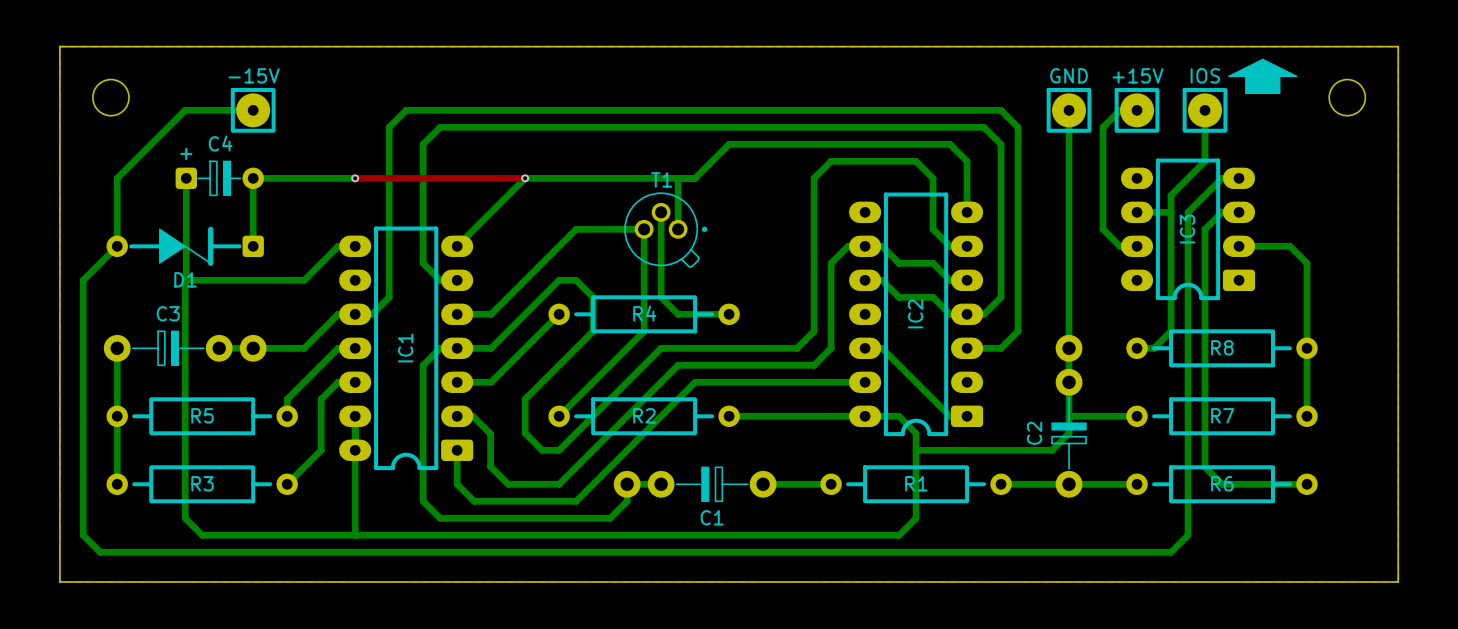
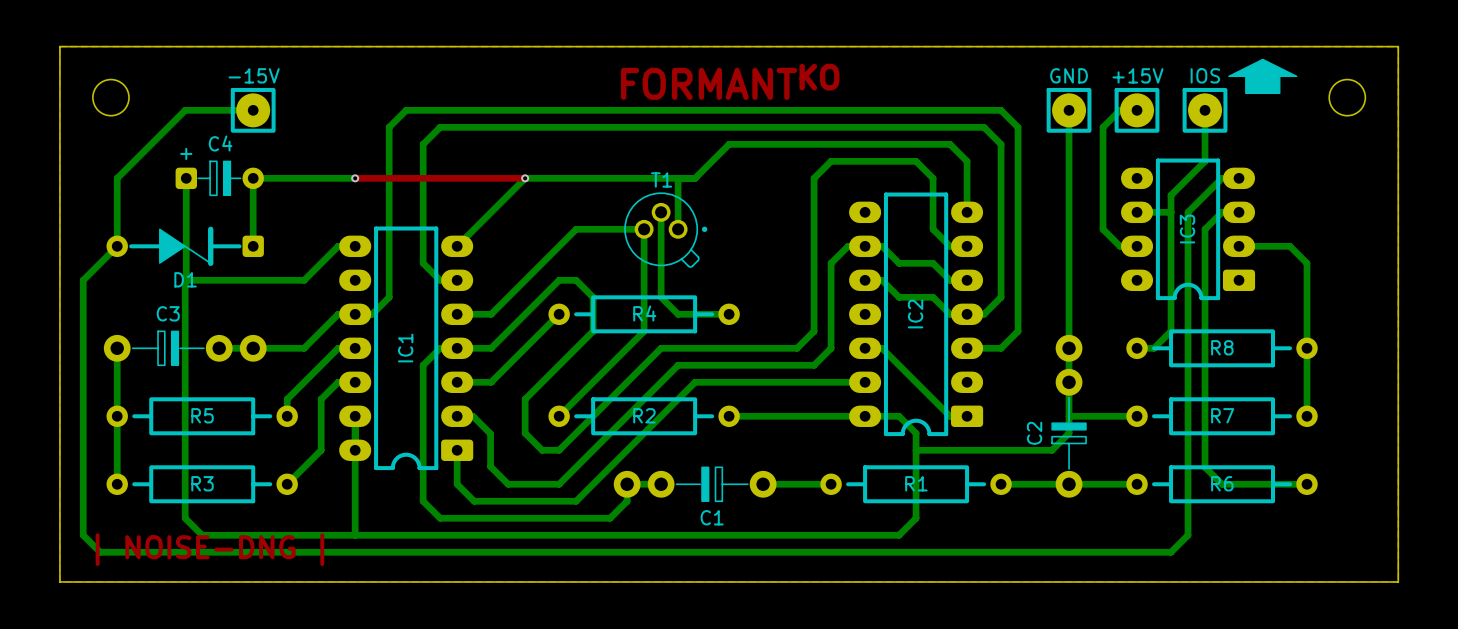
text: none -> FORMANTKO (730, 81)
text: none -> | NOISE-DNG | (209, 549)

